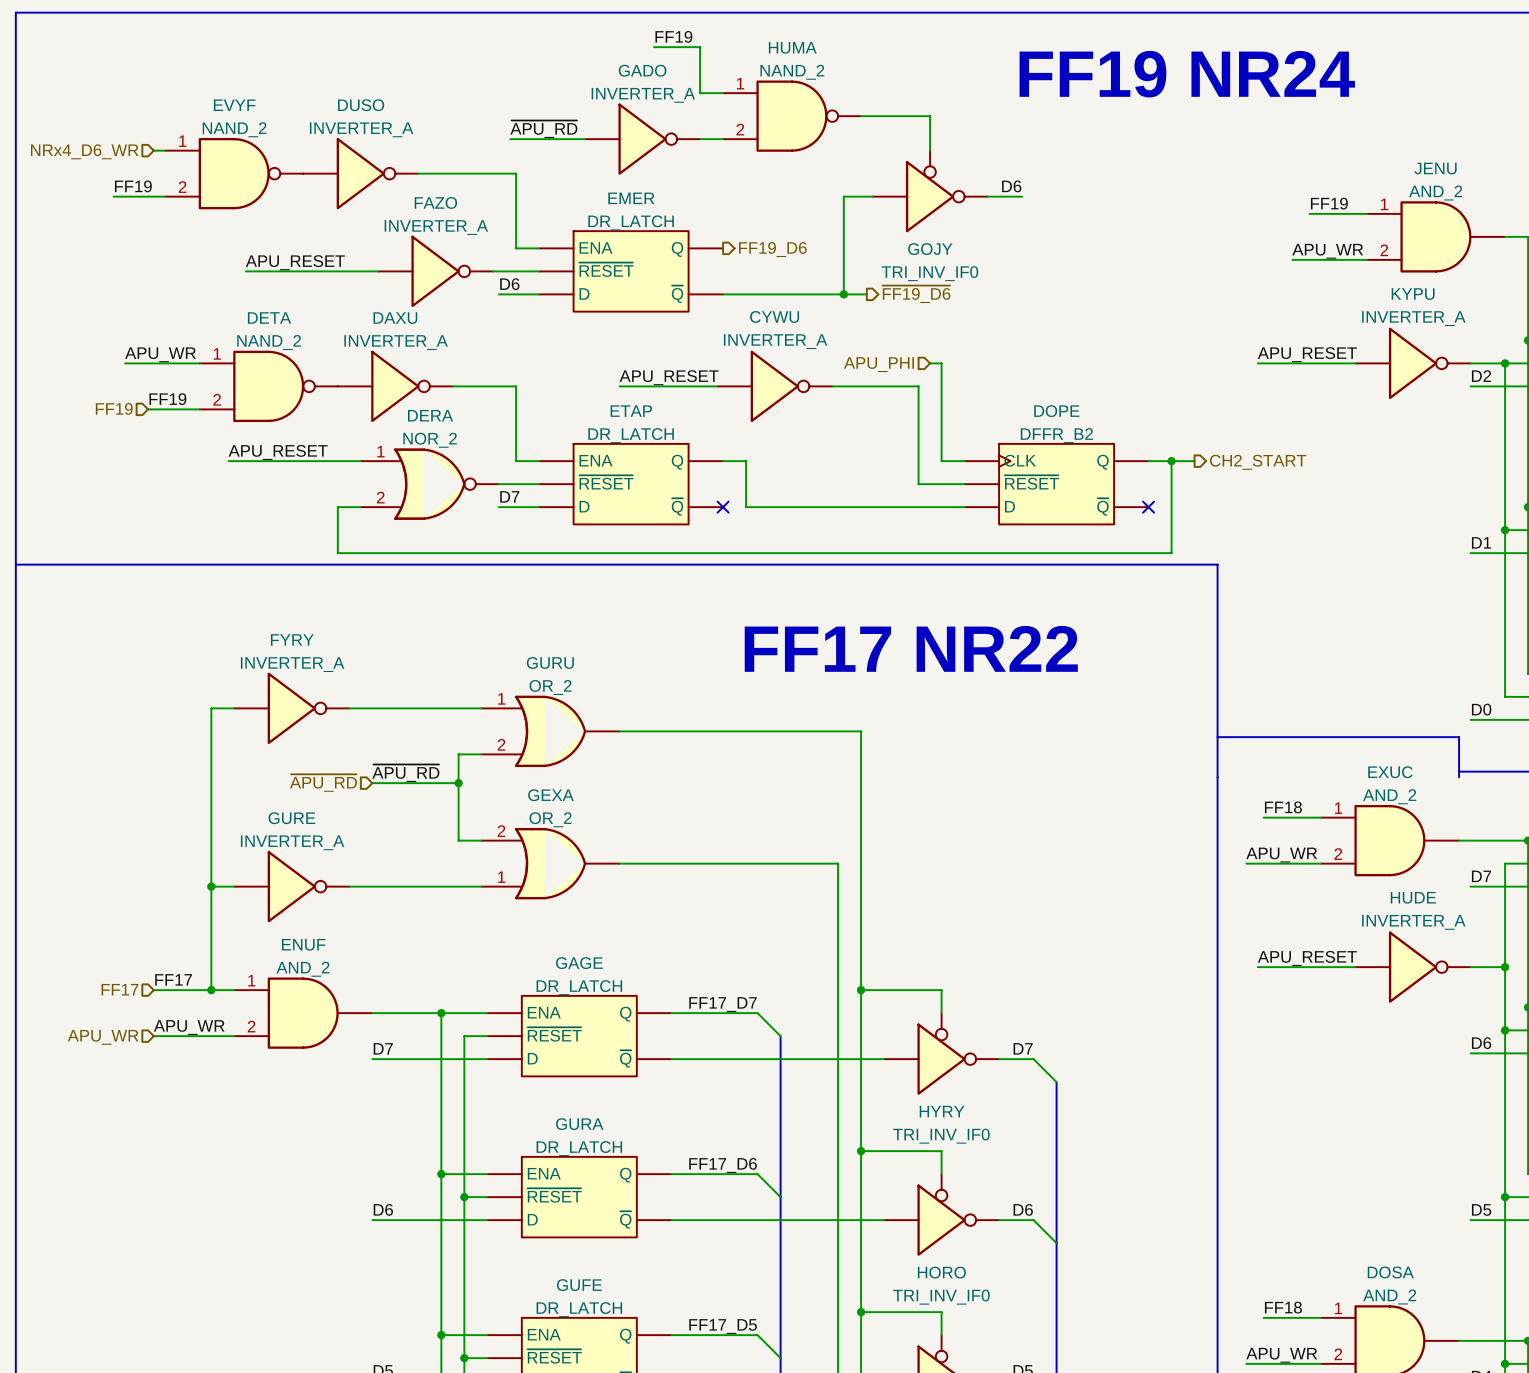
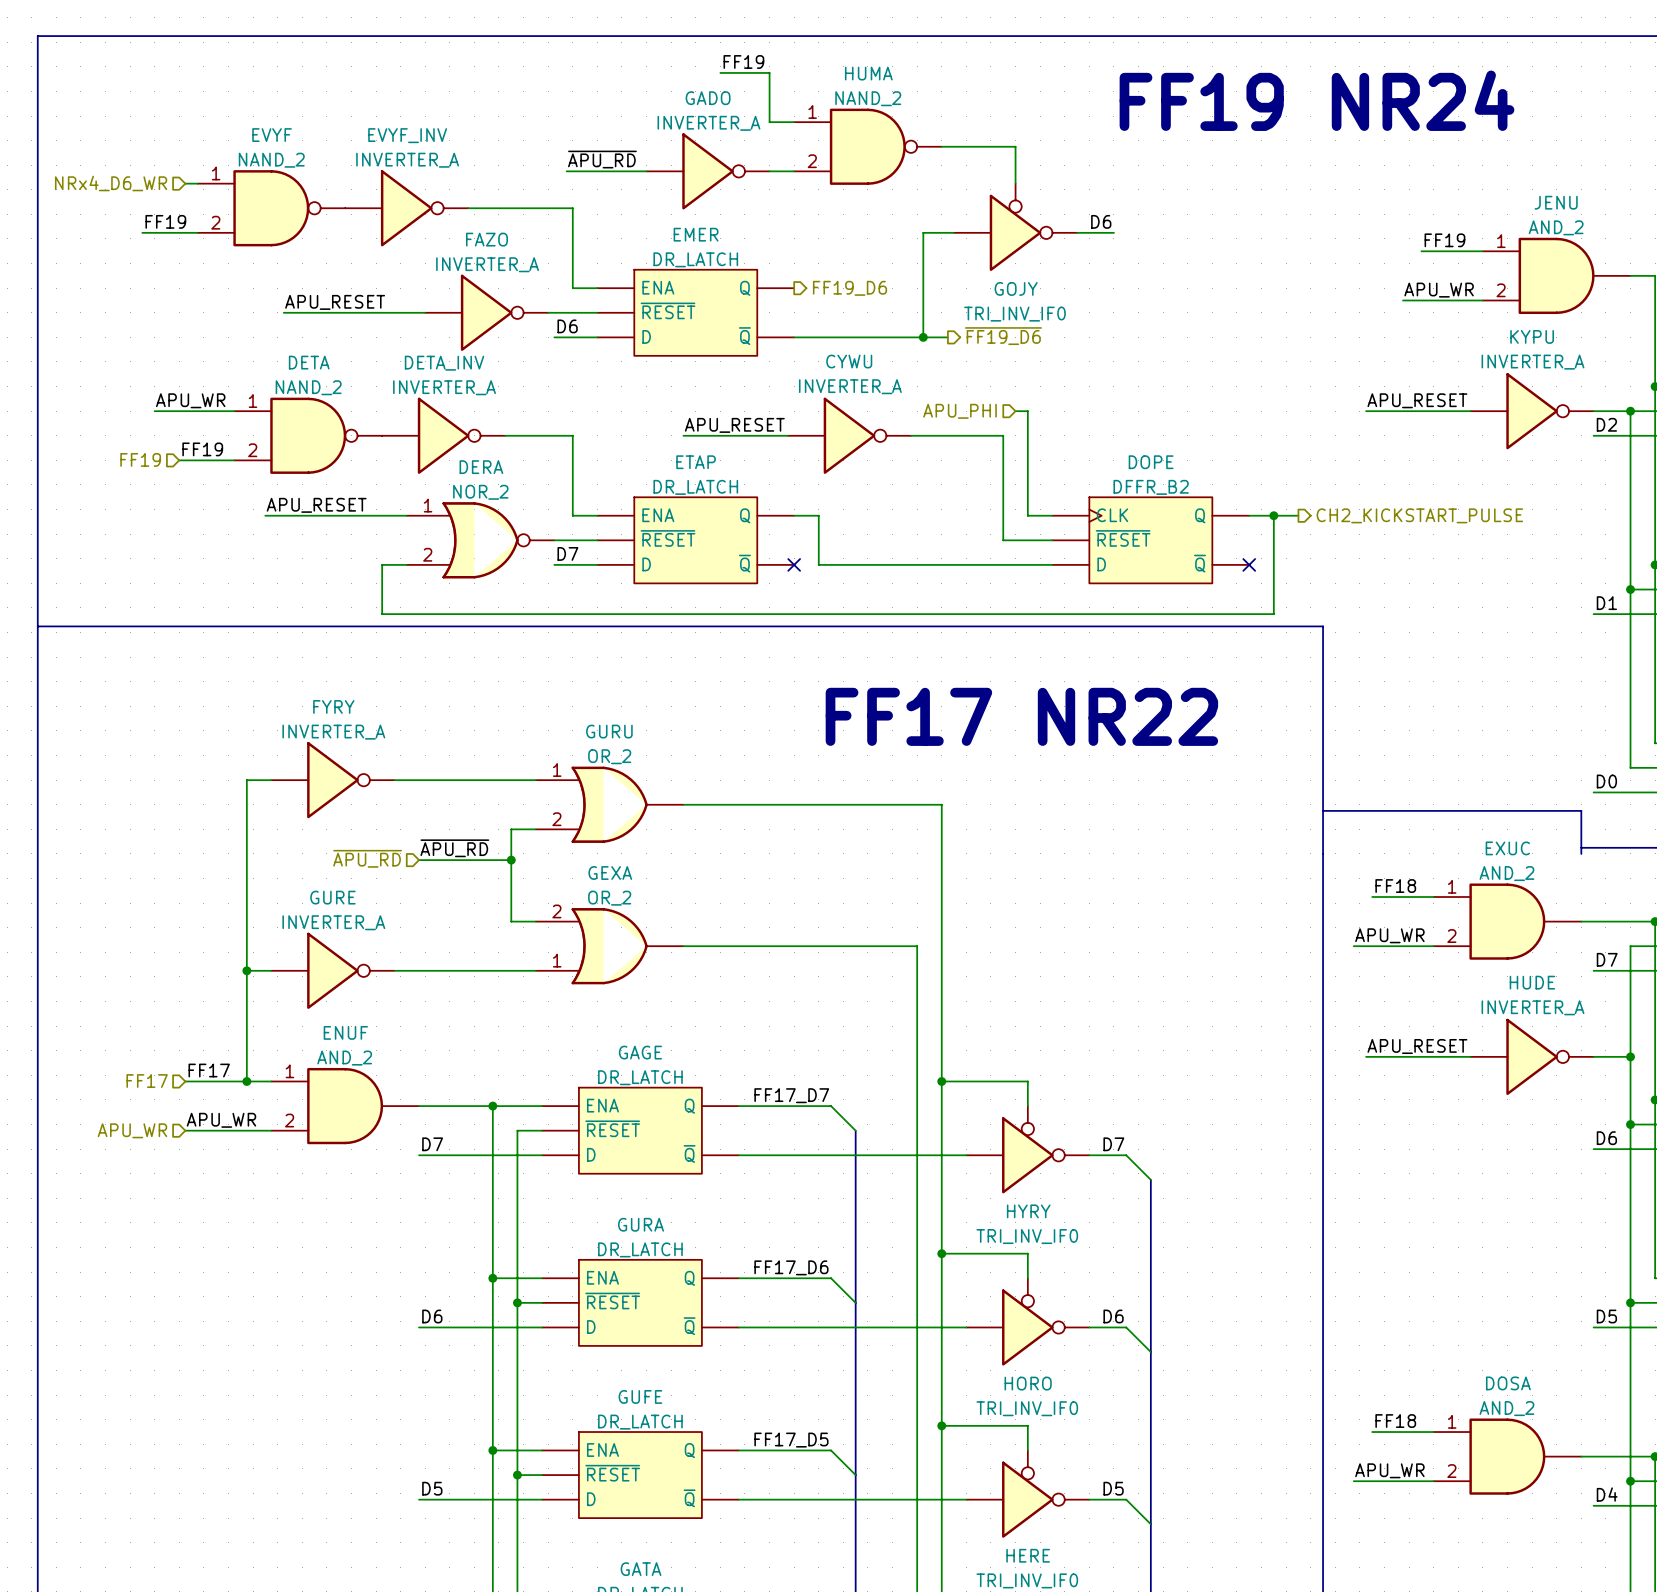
DUSO name: DUSO (361, 105) -> EVYF_INV (407, 135)
DAXU name: DAXU (395, 318) -> DETA_INV (444, 363)
hierarchical label: CH2_START (1258, 462) -> CH2_KICKSTART_PULSE (1419, 515)

